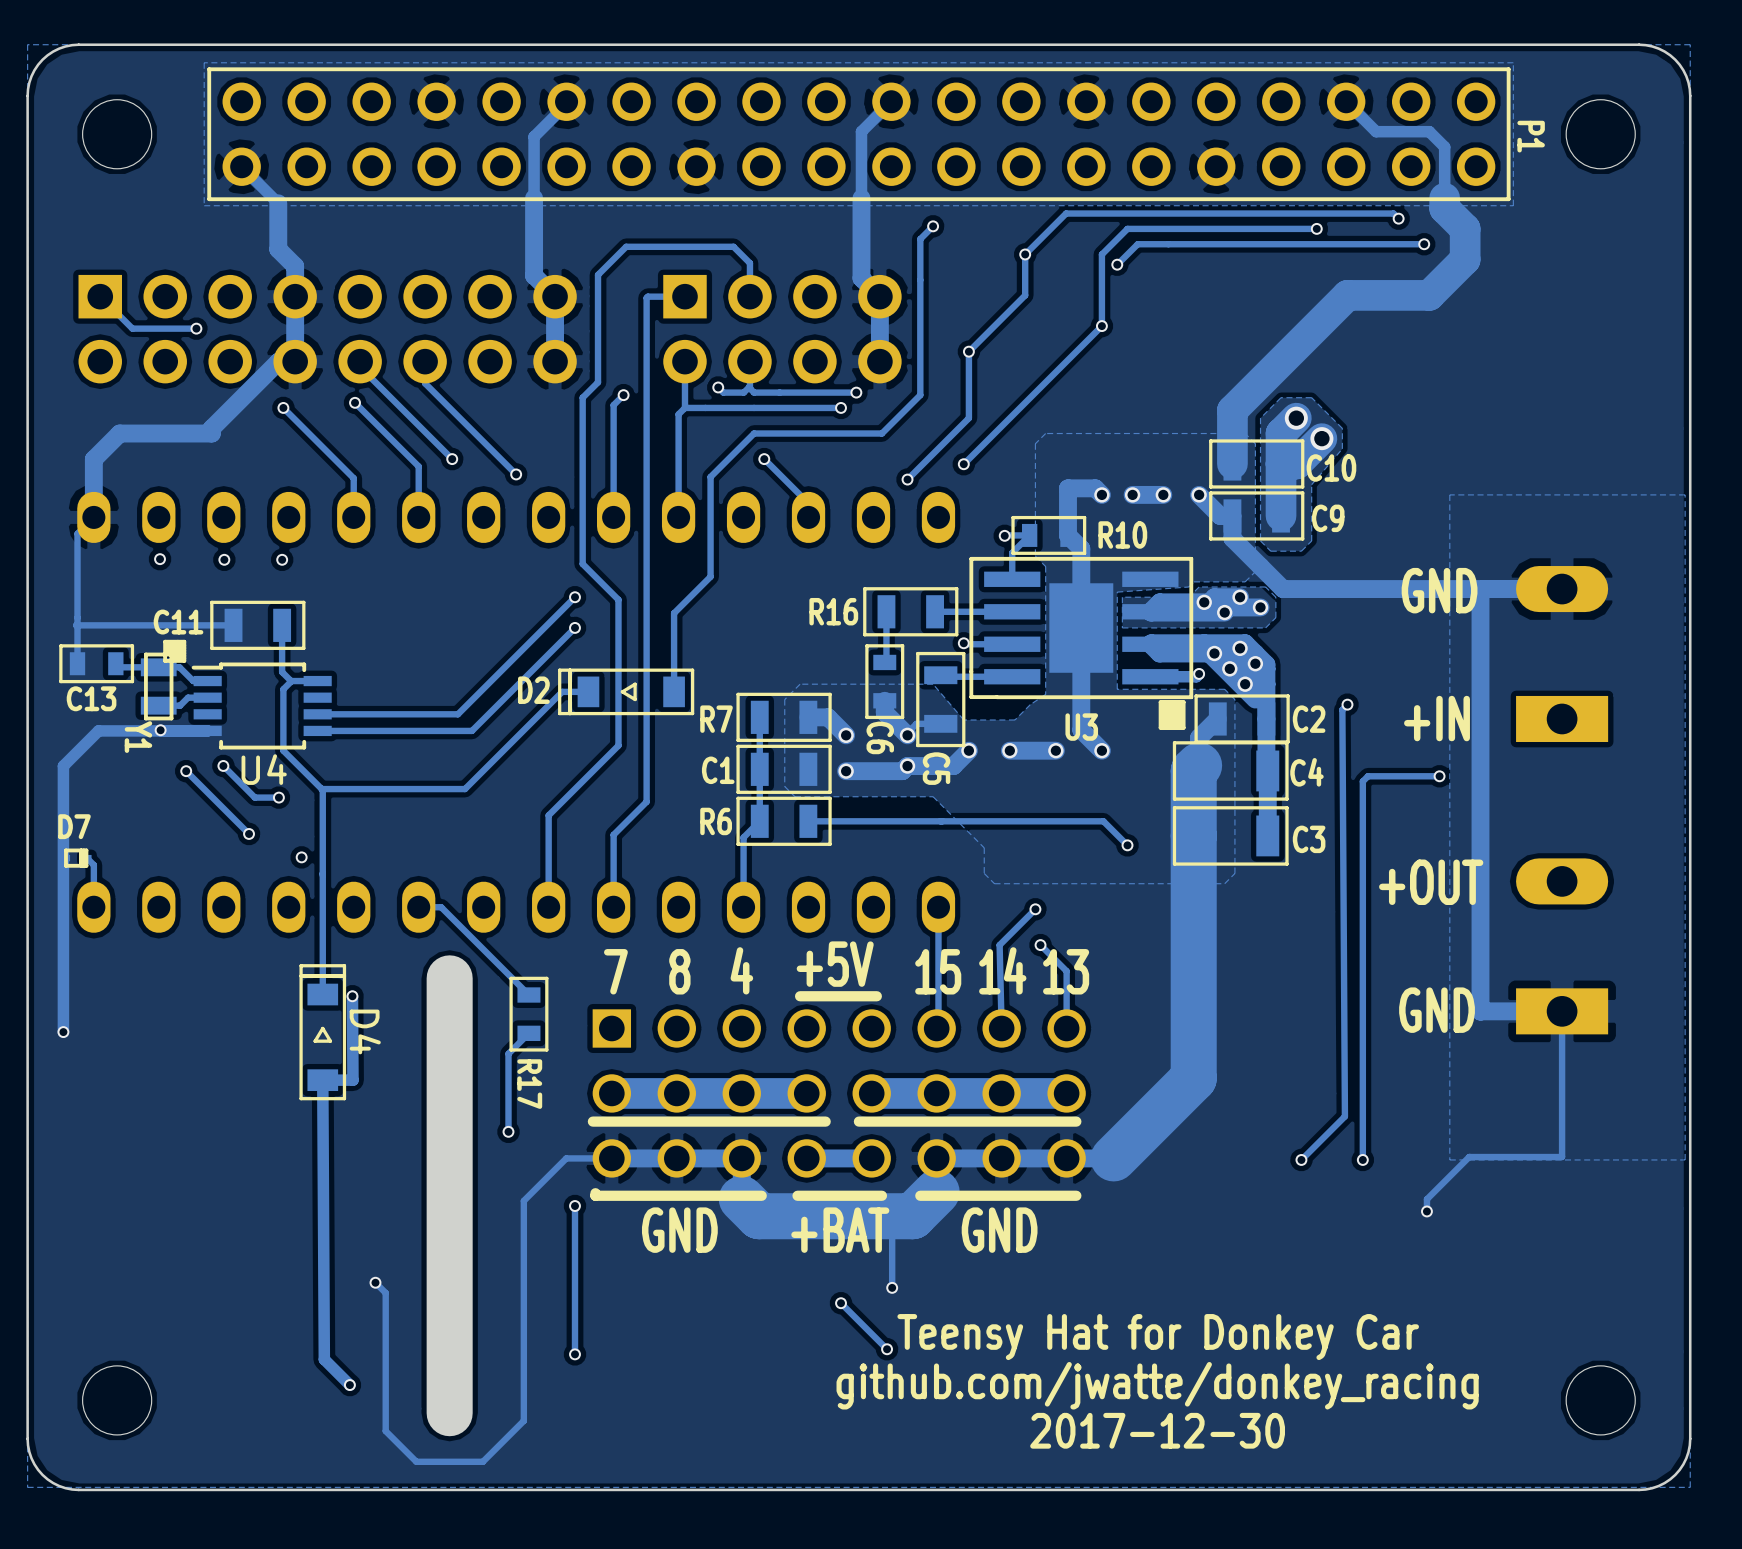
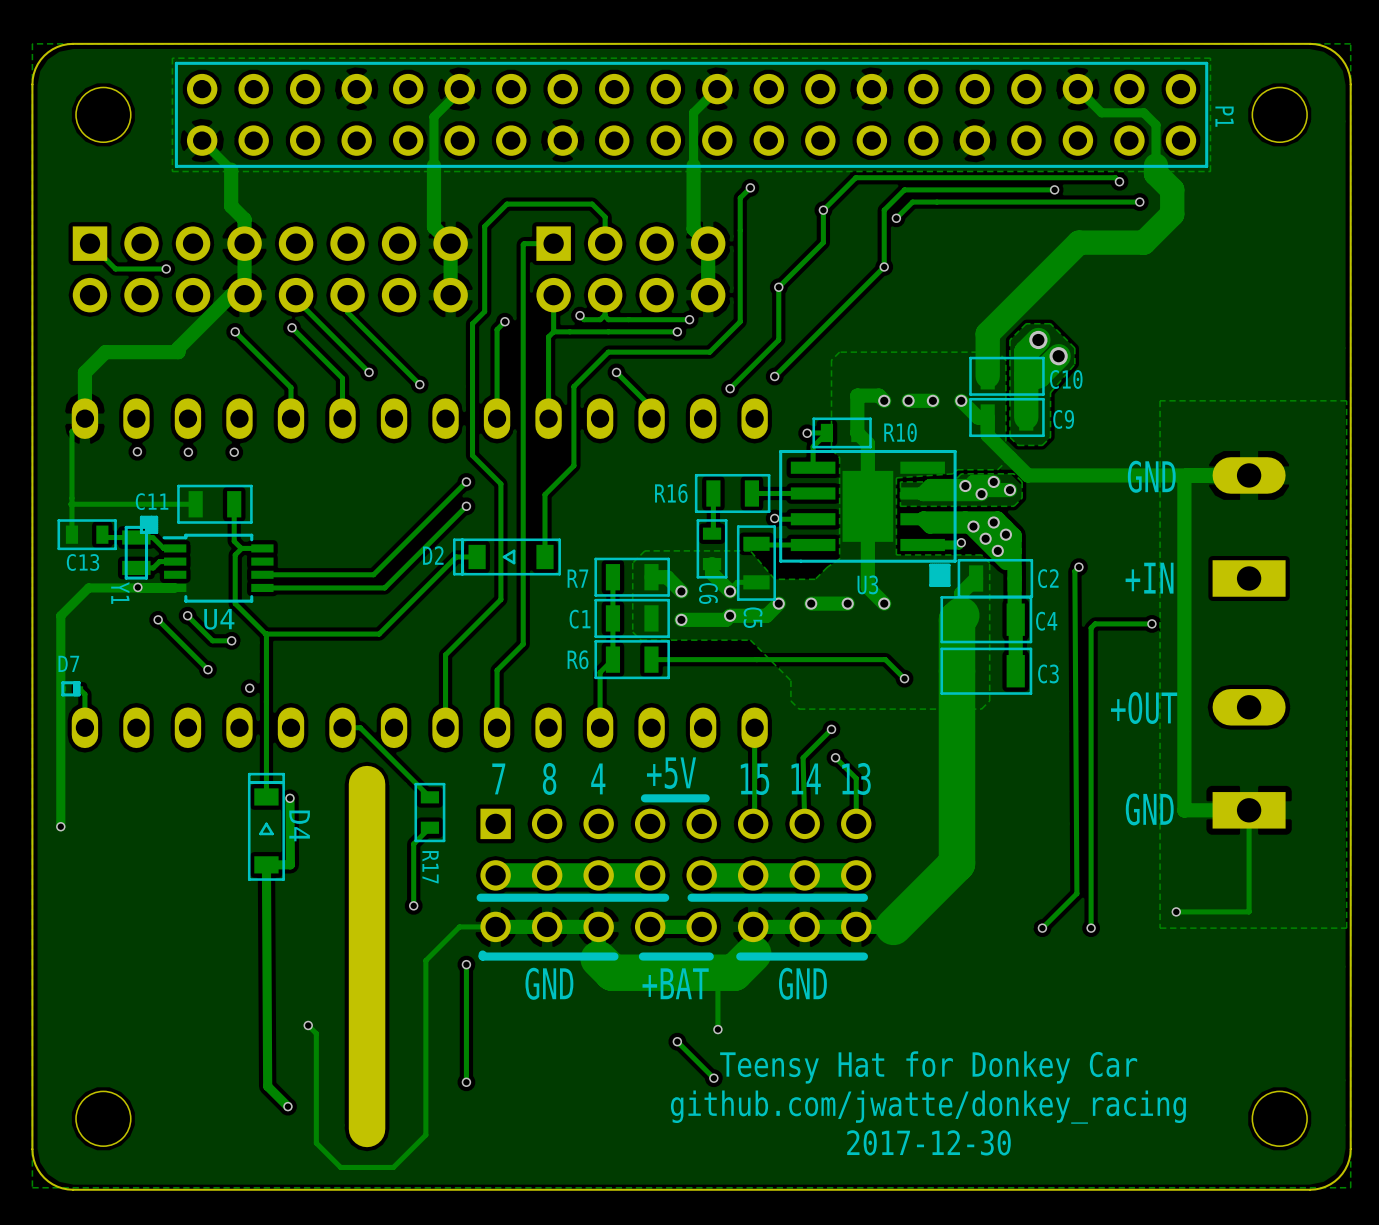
track: (1562, 1139) (1562, 1156) -> (1248, 911) (1176, 911)
track: (1561, 1157) (1469, 1157) (1426, 1199) (1426, 1211) -> none
via position: (1426, 1211) -> (1176, 911)

